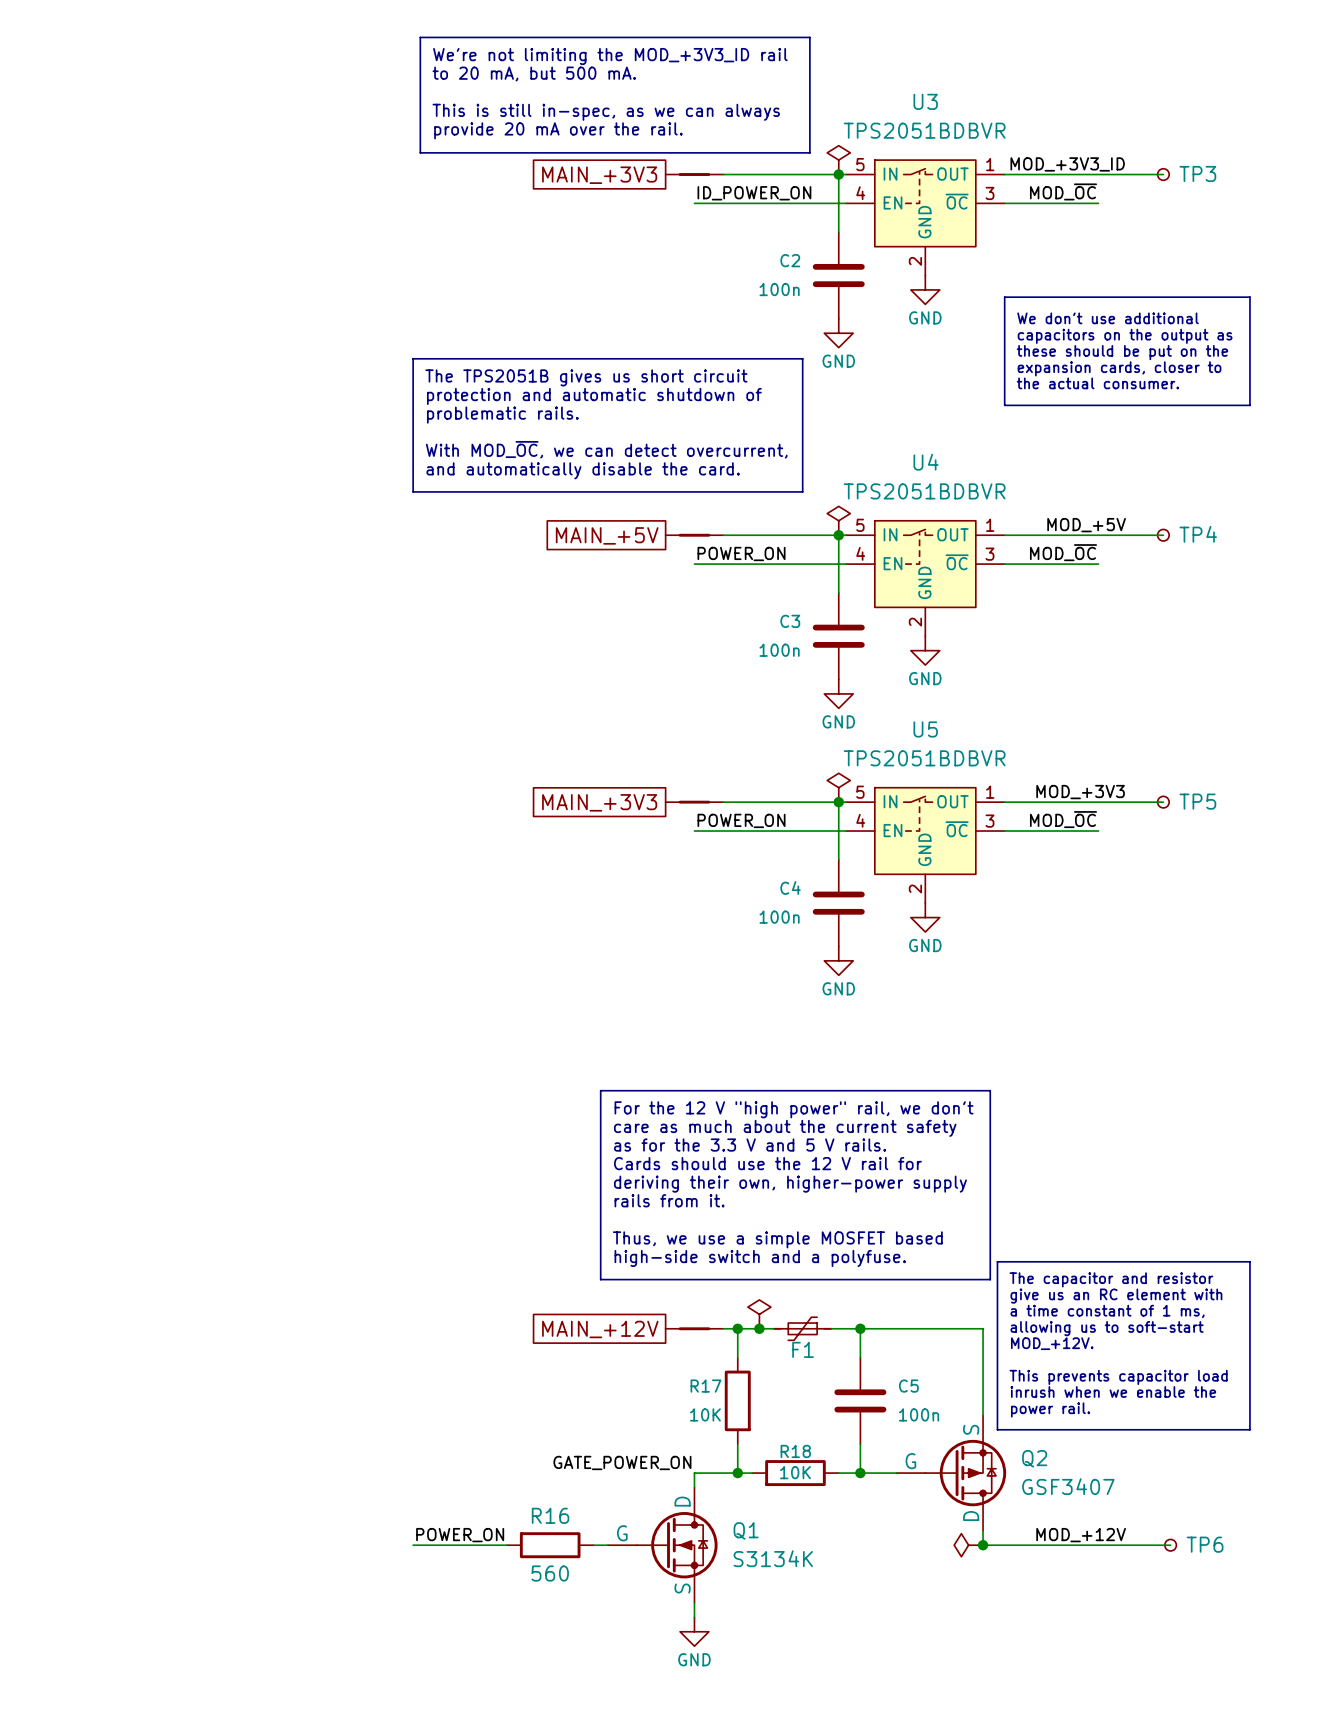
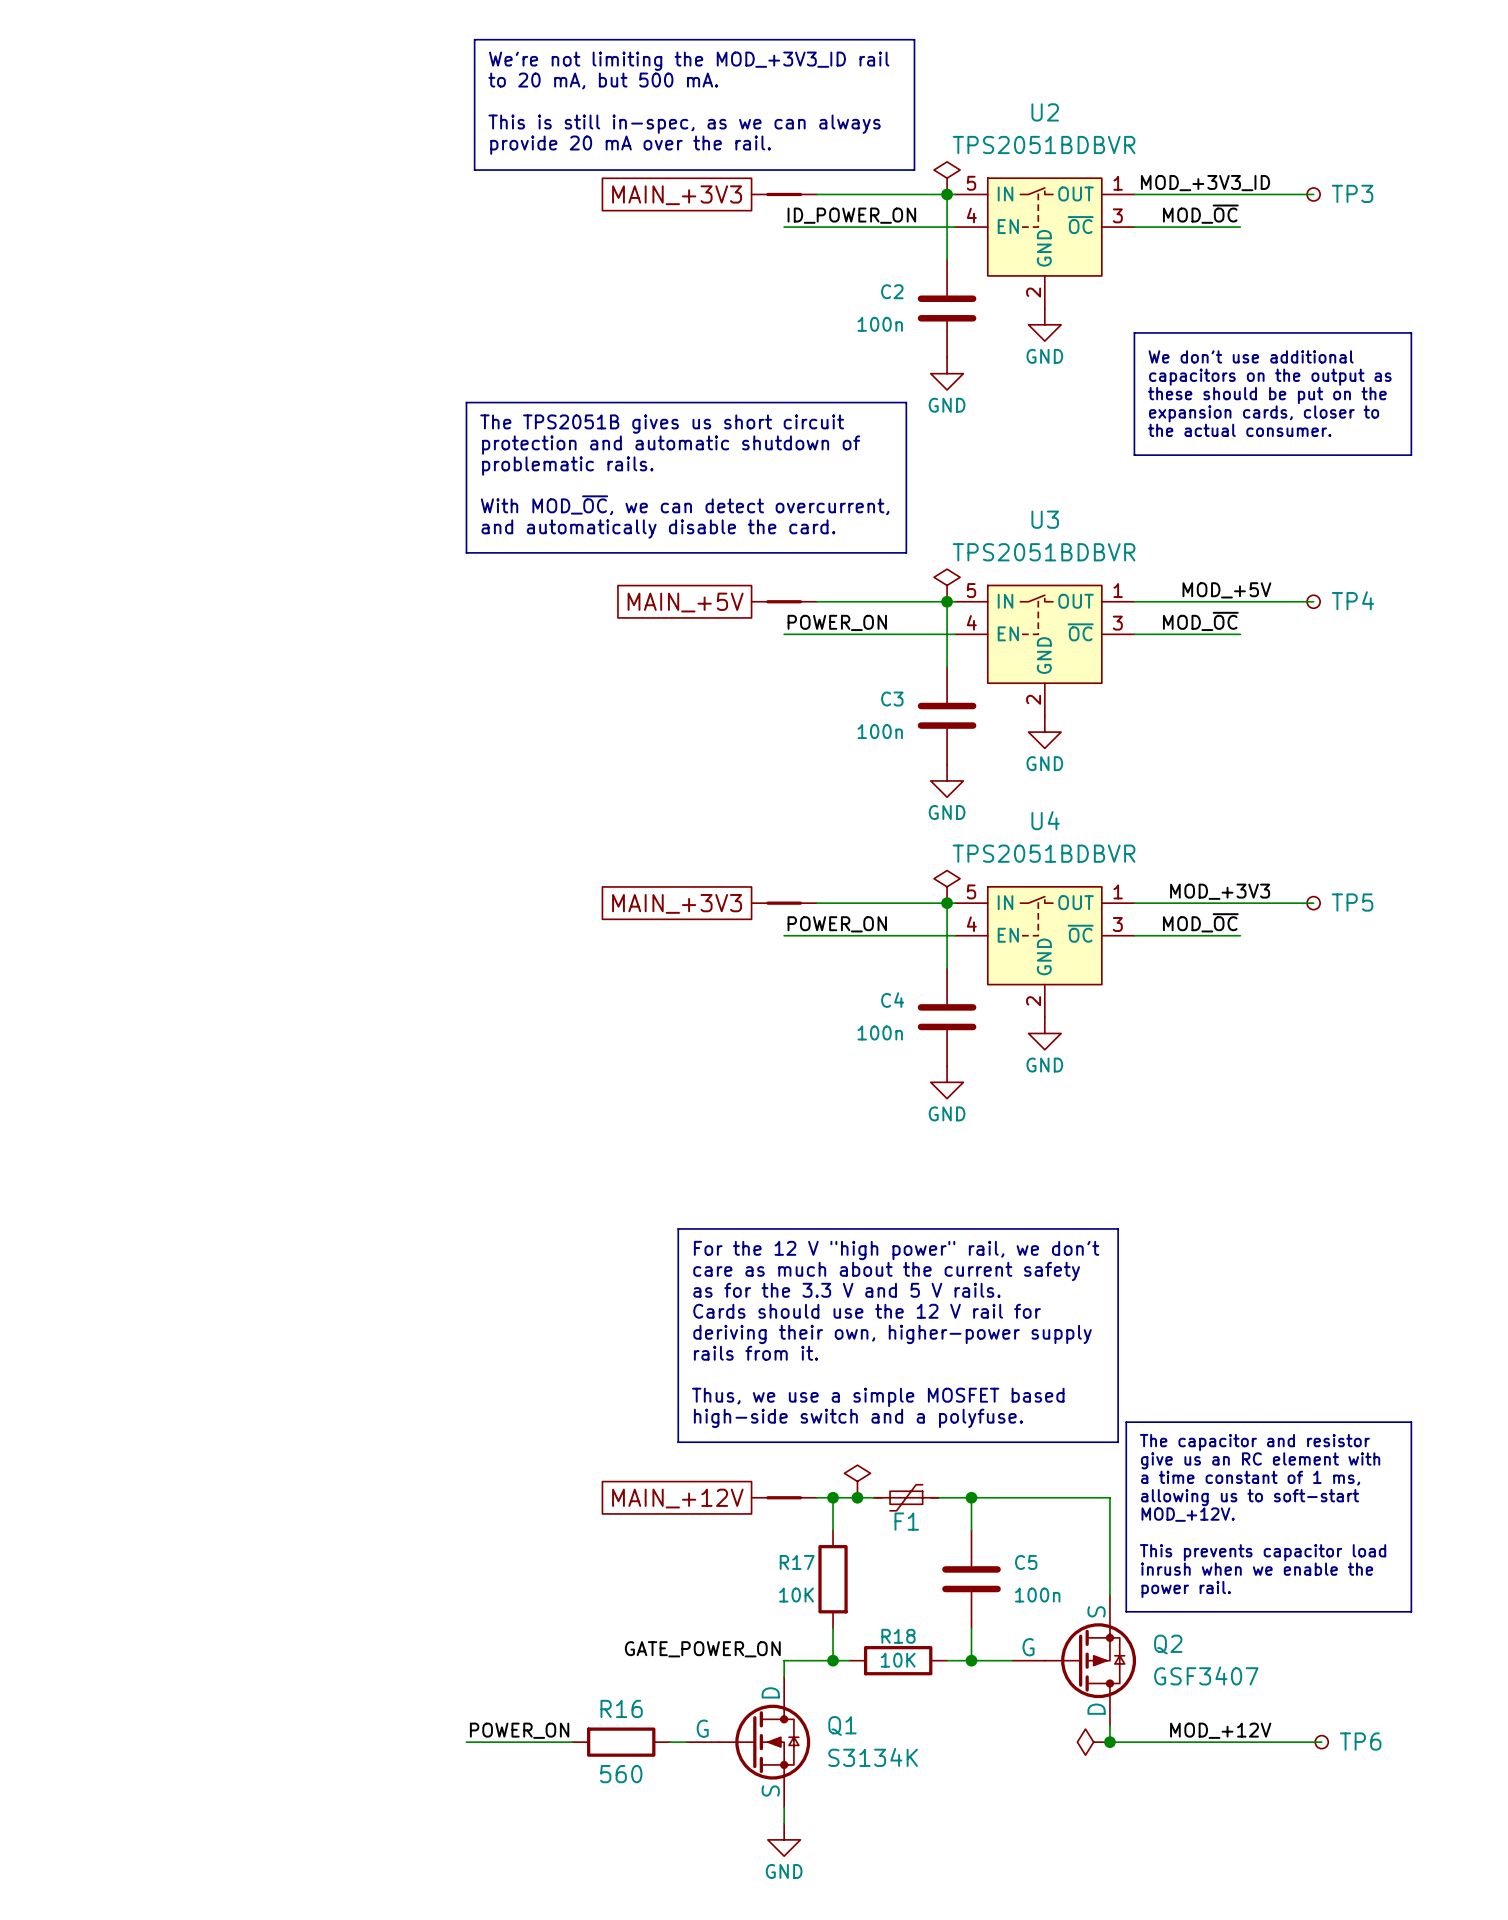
U3 name: U3 (925, 101) -> U2 (1045, 112)
U4 name: U4 (926, 462) -> U3 (1045, 519)
U5 name: U5 (925, 729) -> U4 (1045, 820)

